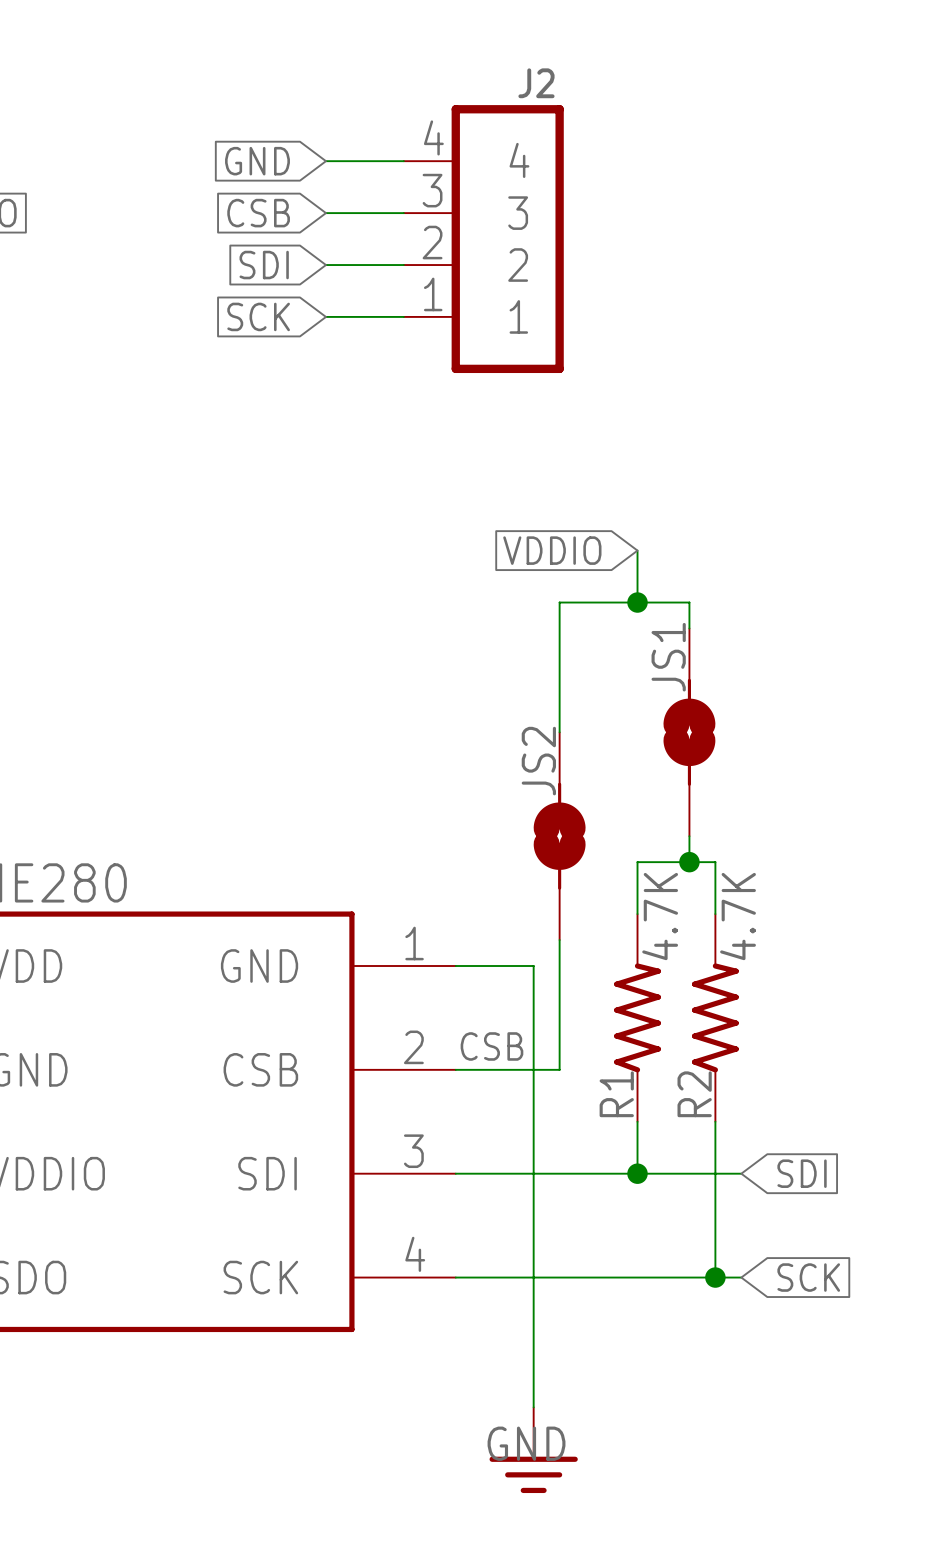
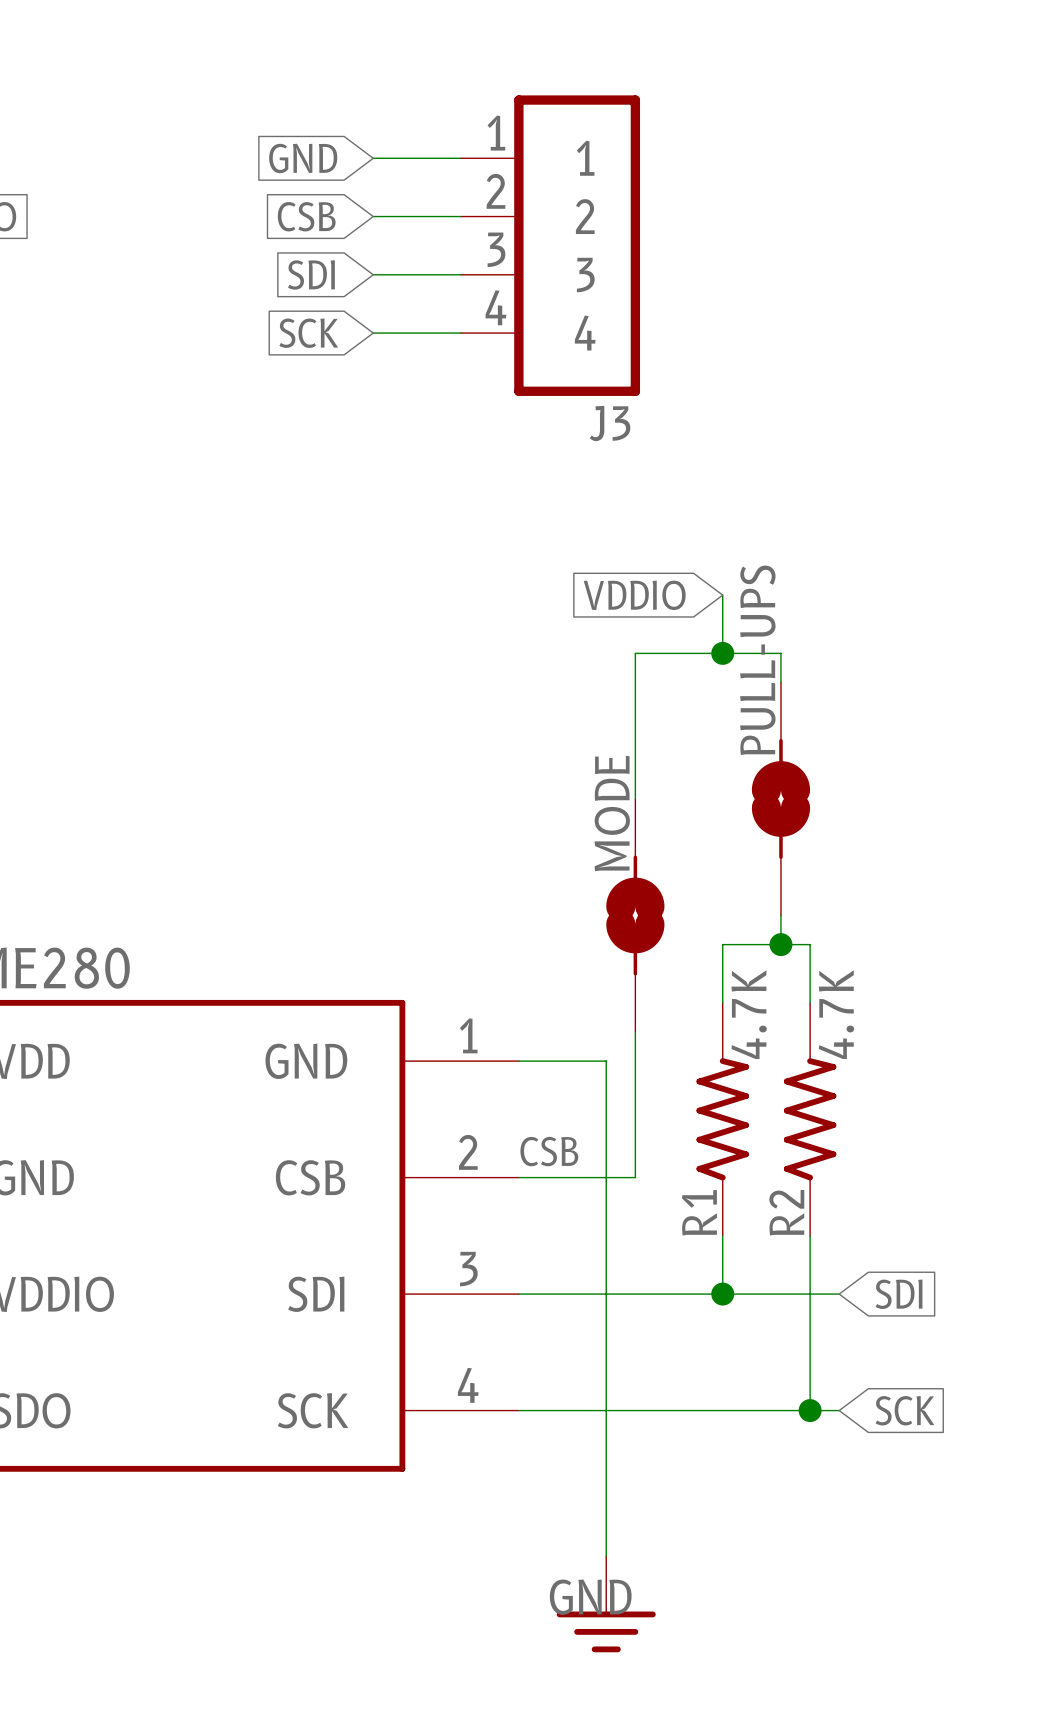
J2 name: J2 (536, 83) -> J3 (610, 423)
J2 flip: as is (507, 239) -> up-down (577, 245)
JS1 name: JS1 (668, 657) -> PULL-UPS (757, 660)
JS2 name: JS2 (538, 761) -> MODE (612, 813)

